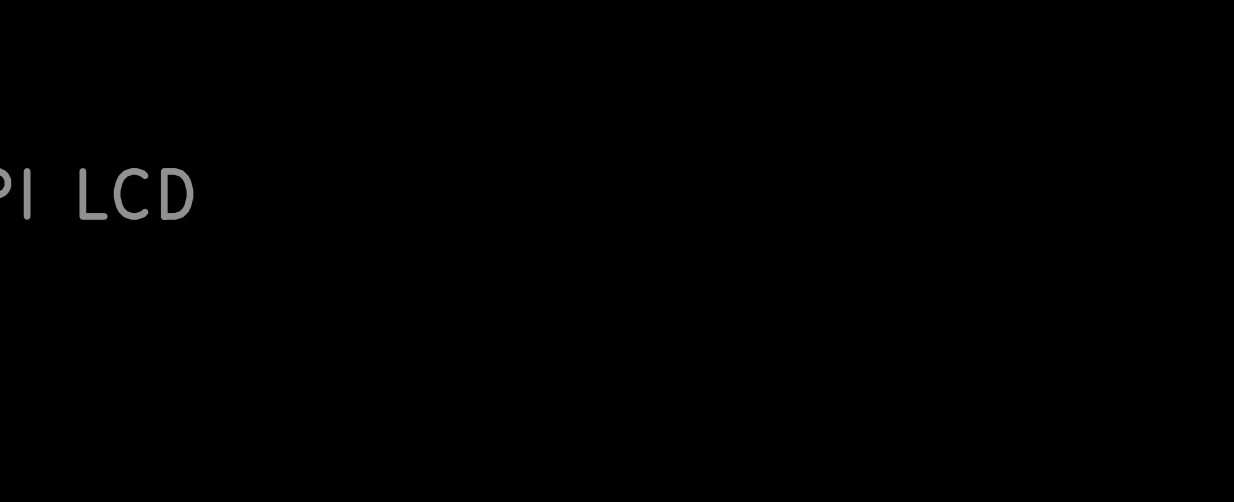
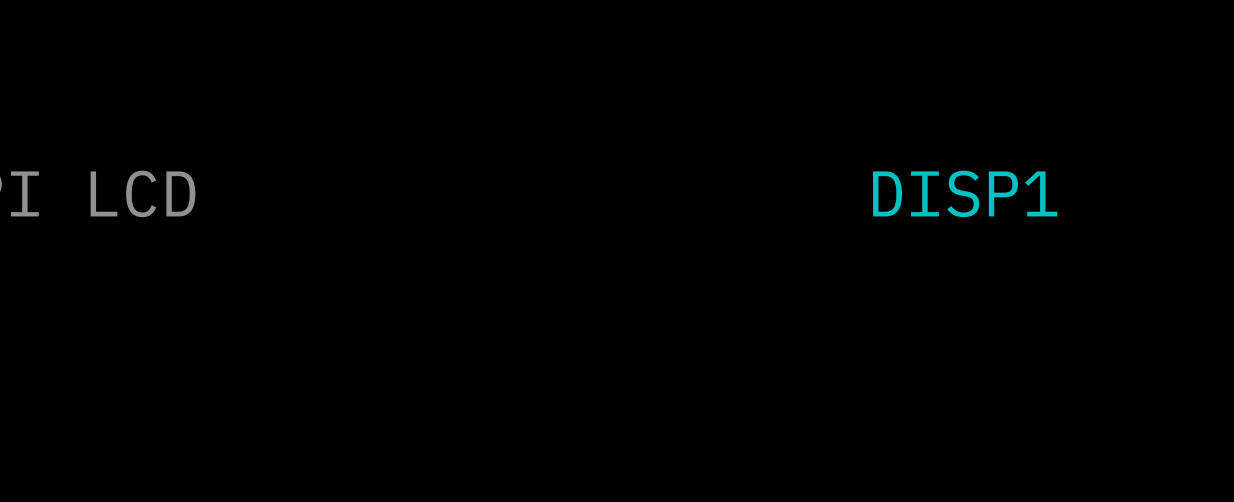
DISP1 name: none -> DISP1 (965, 193)

